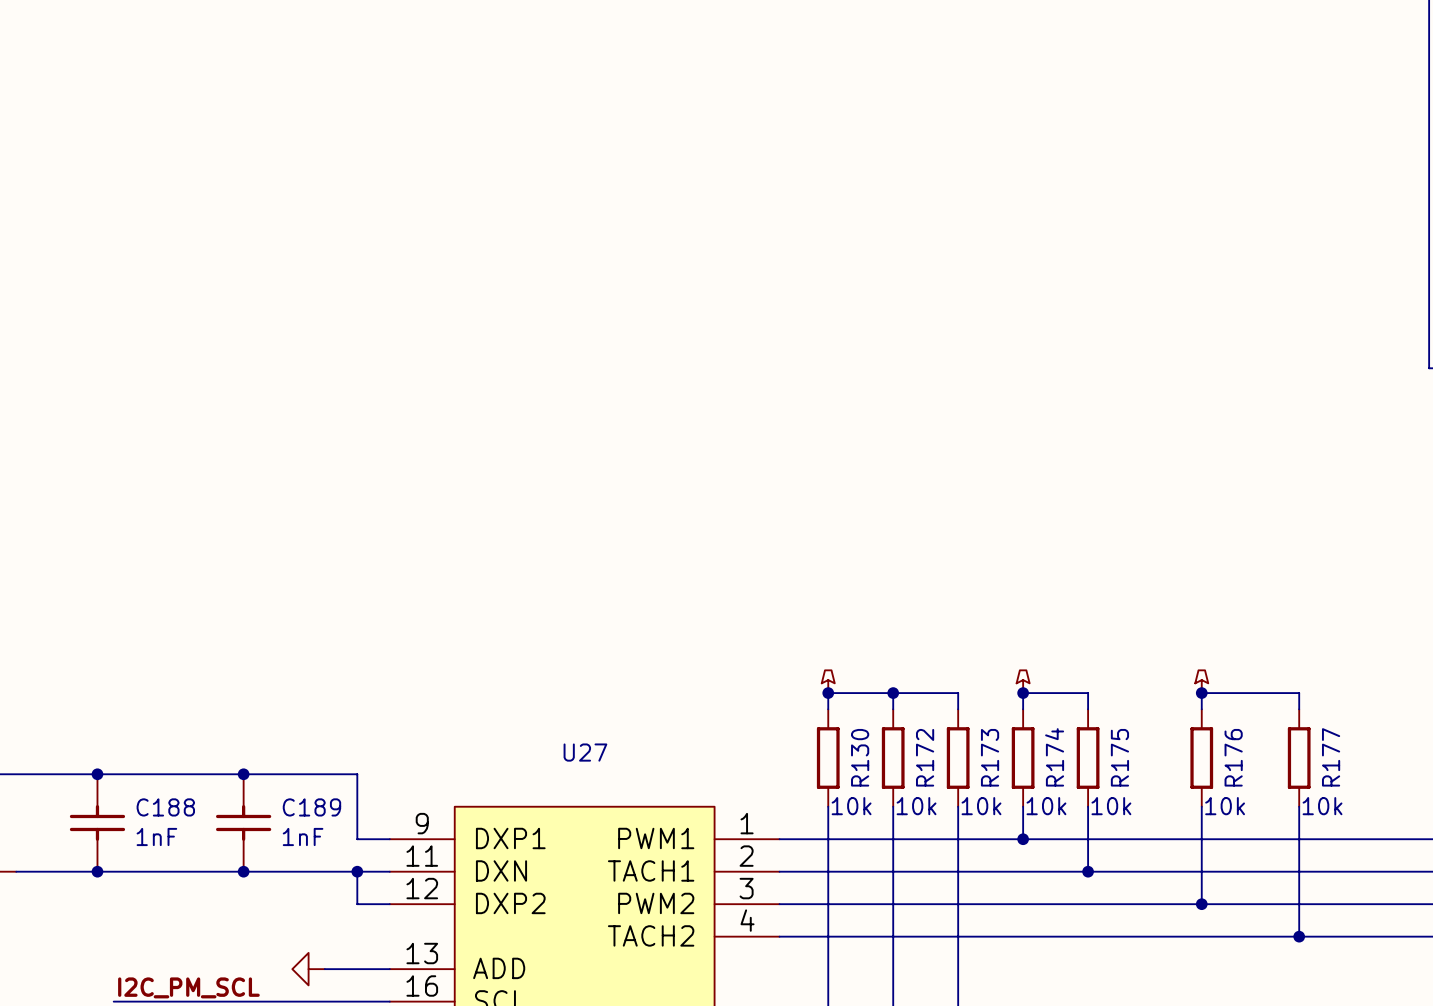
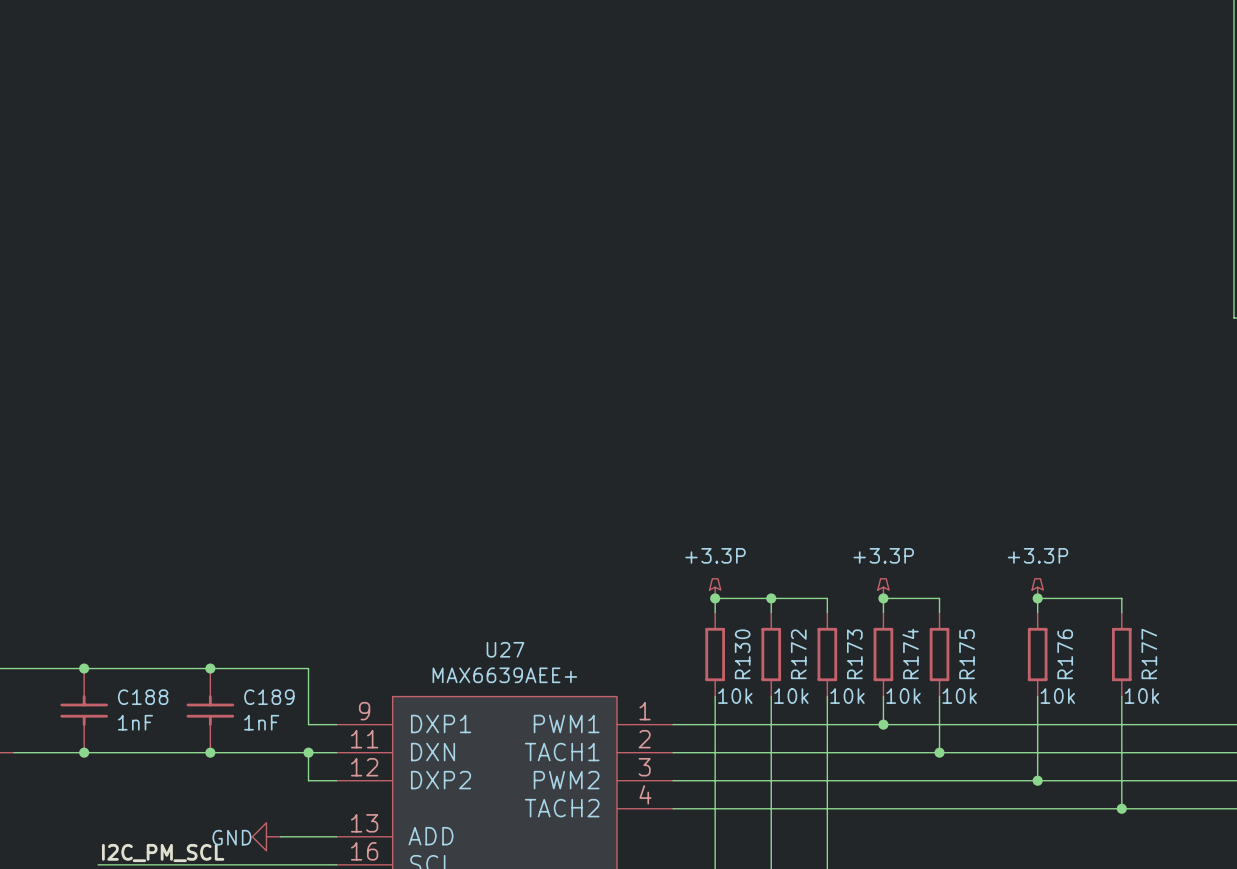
power symbol text: none -> +3.3P (715, 555)
power symbol text: none -> +3.3P (883, 555)
power symbol text: none -> +3.3P (1038, 555)
U27 value: none -> MAX6639AEE+ (504, 675)
power symbol text: none -> GND (231, 837)

